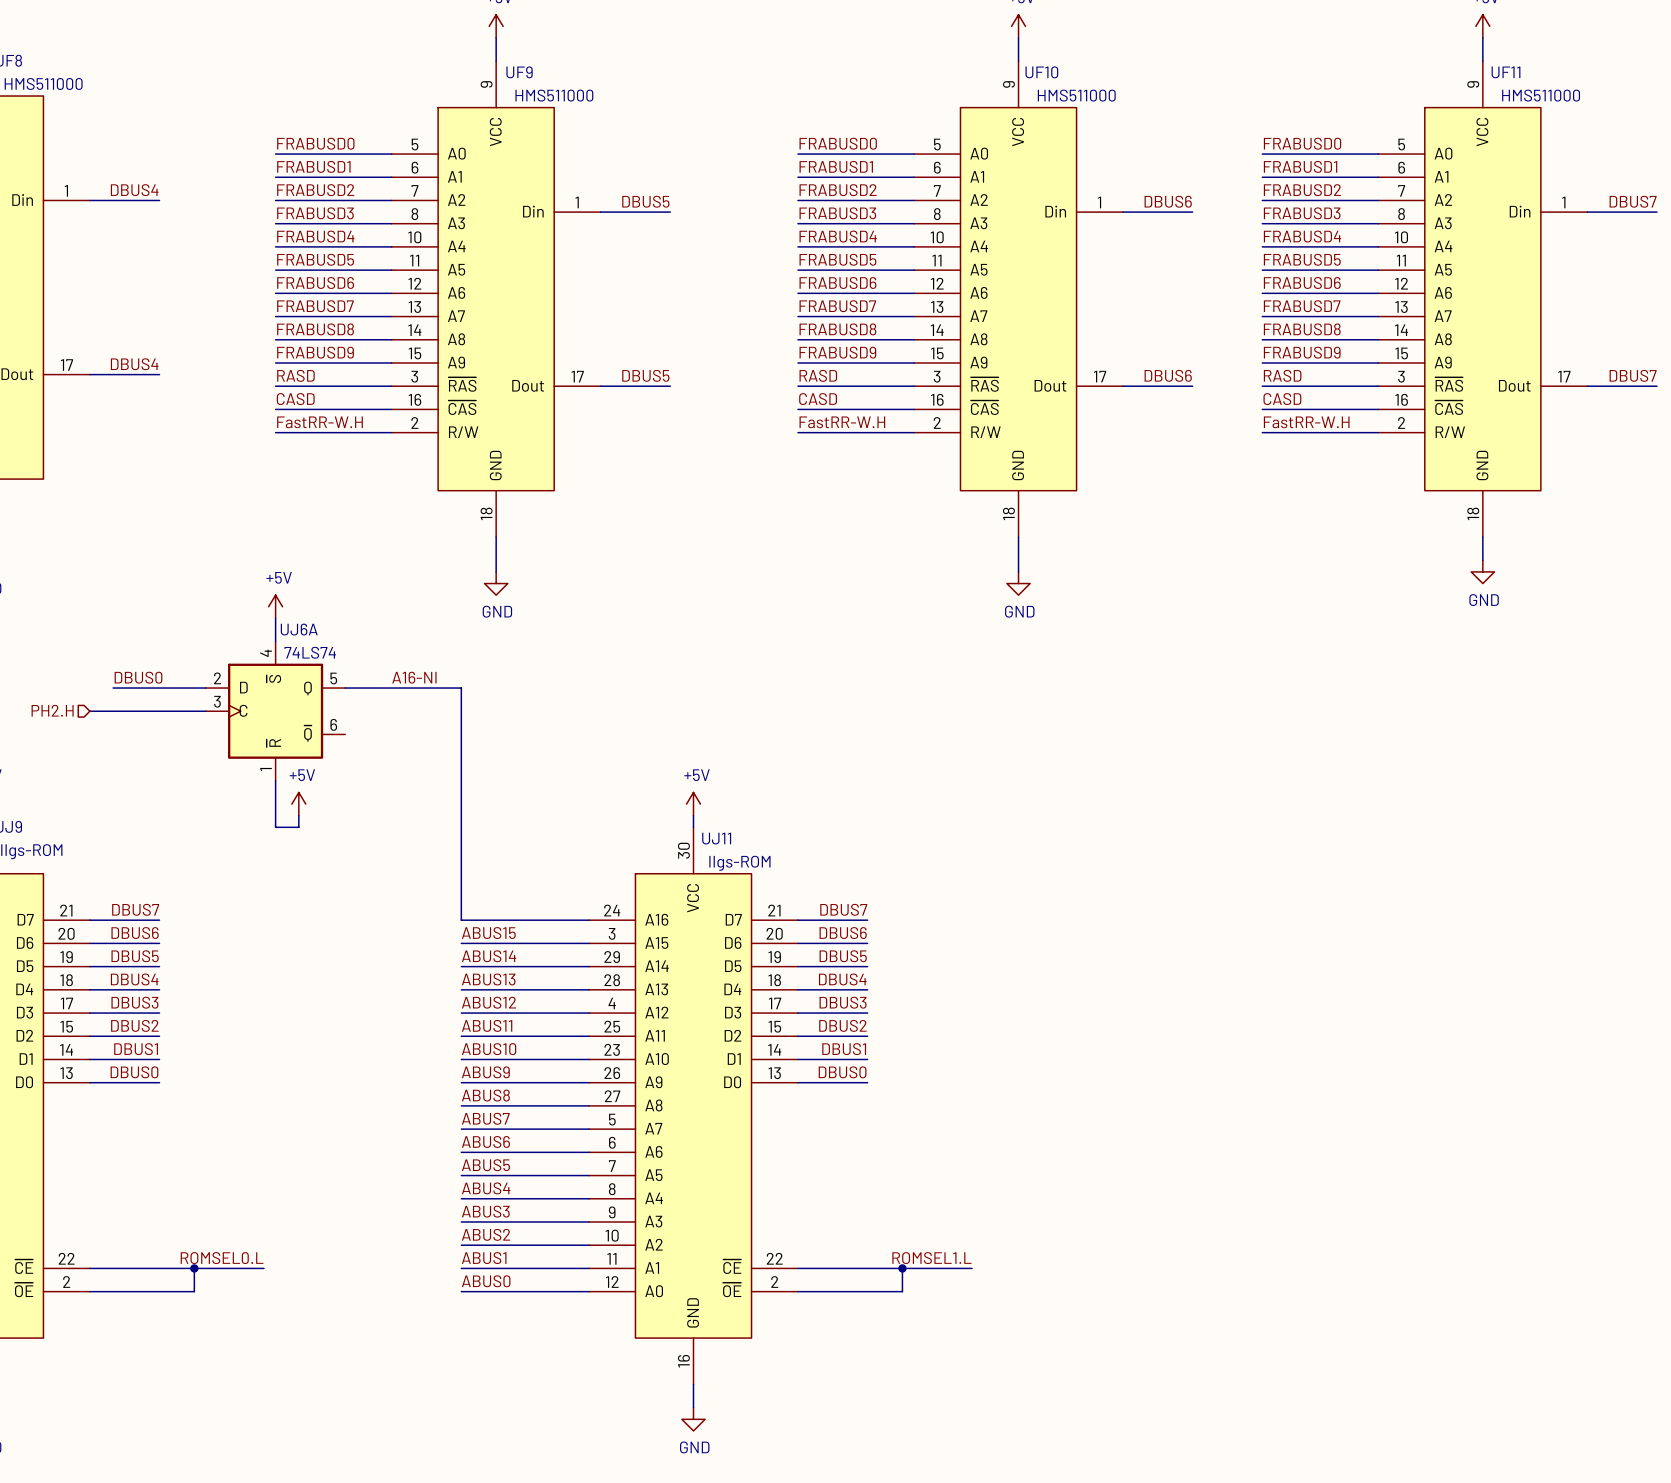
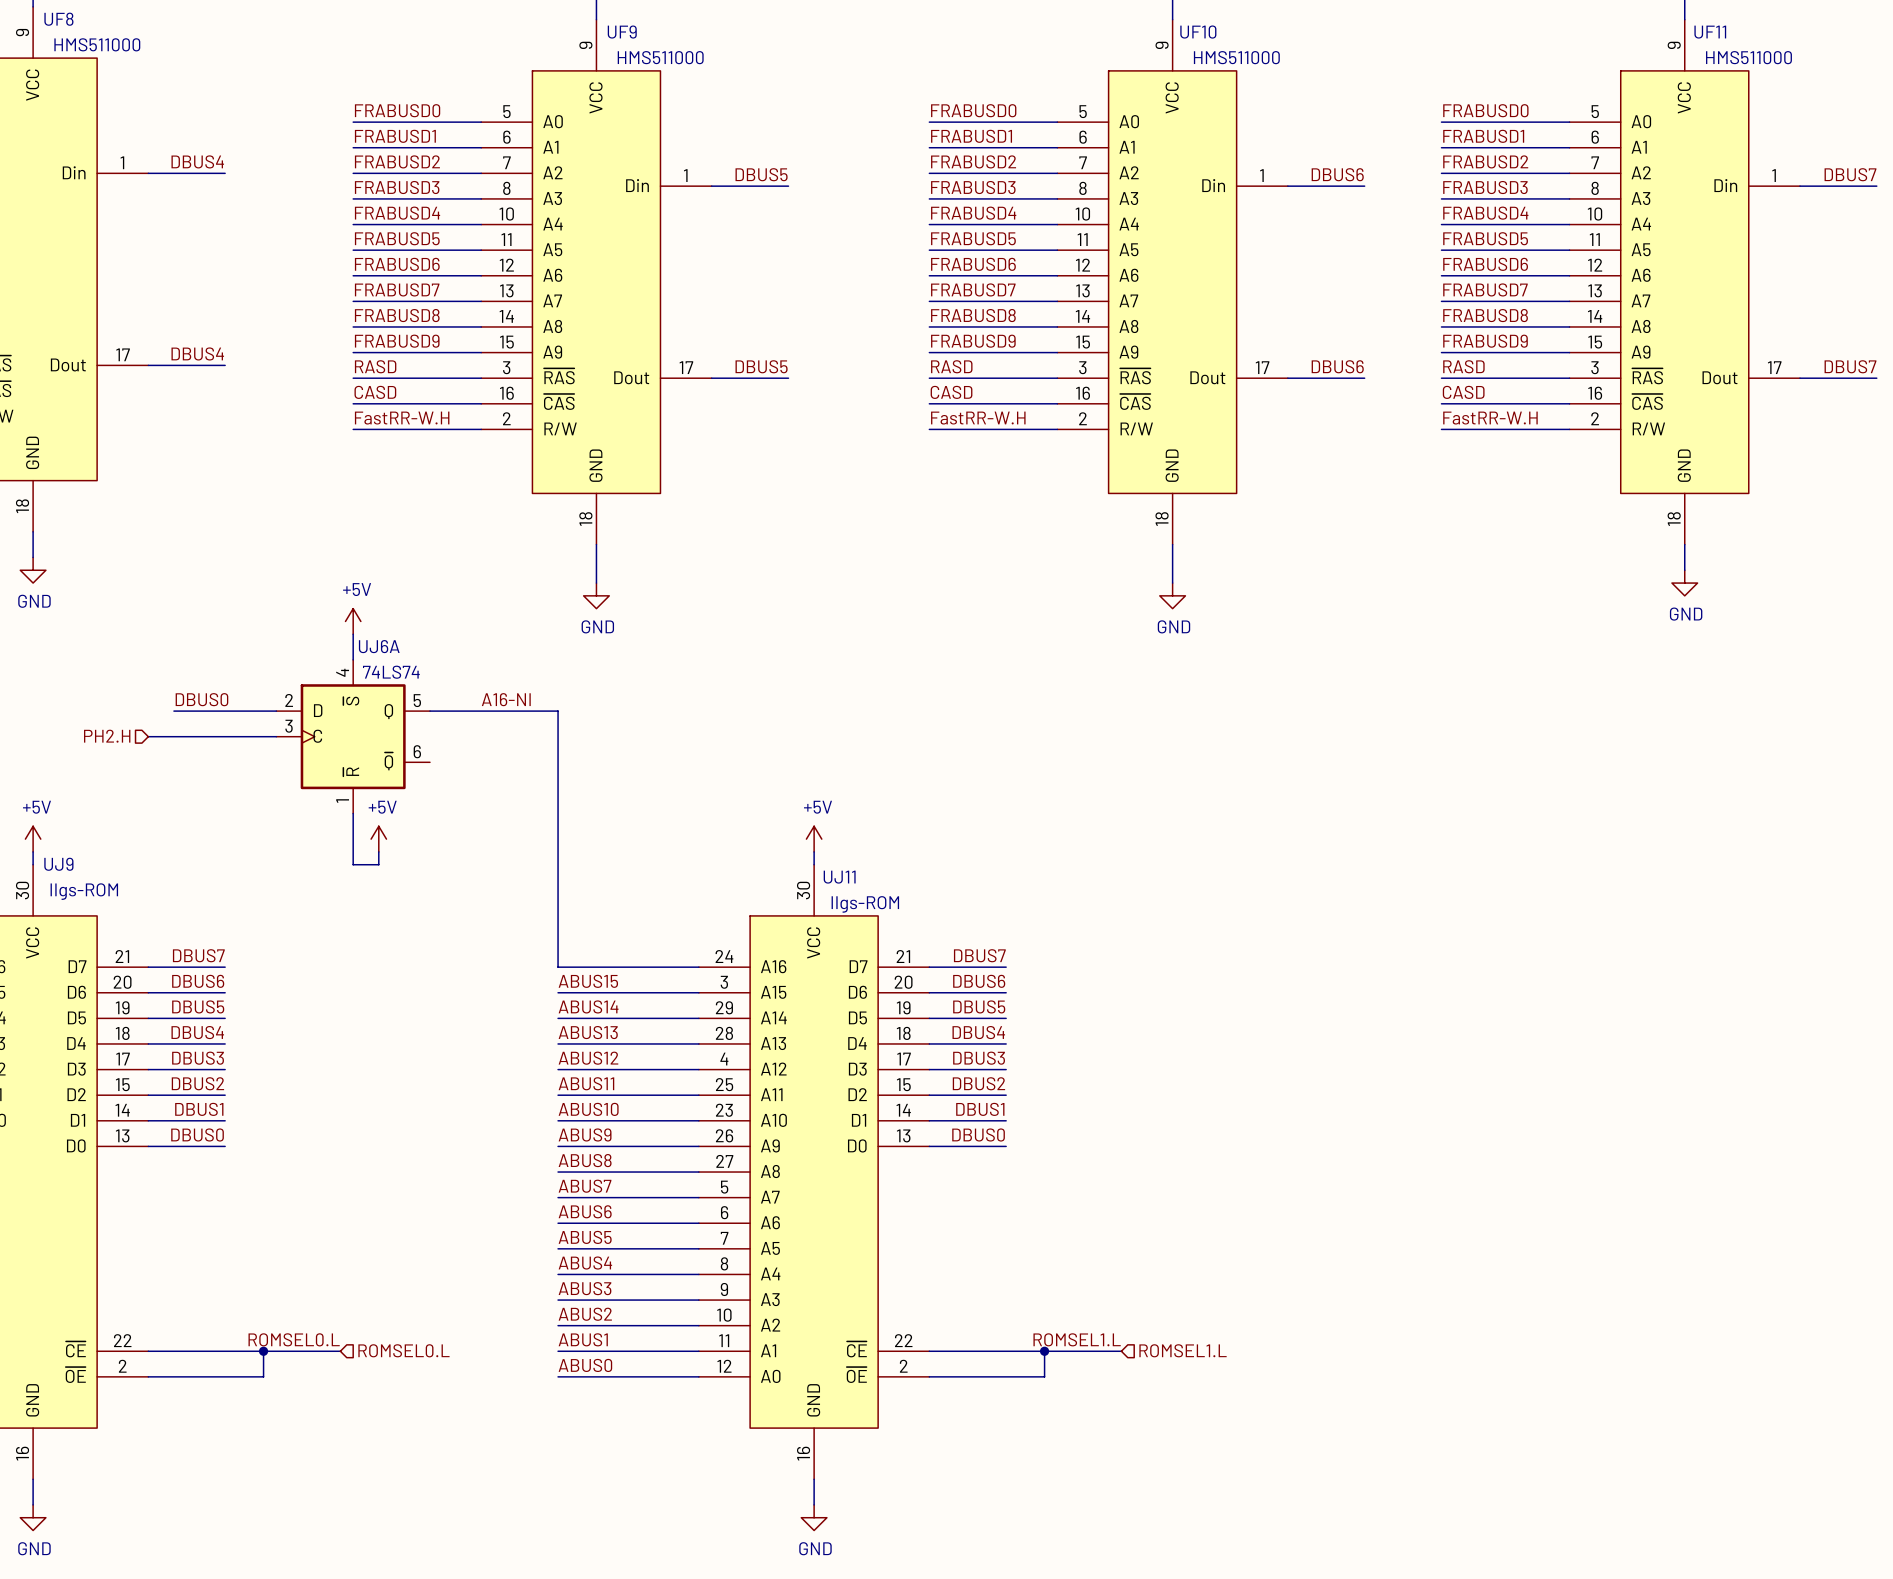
hierarchical label: none -> ROMSEL1.L (1183, 1350)
hierarchical label: none -> ROMSEL0.L (403, 1350)

